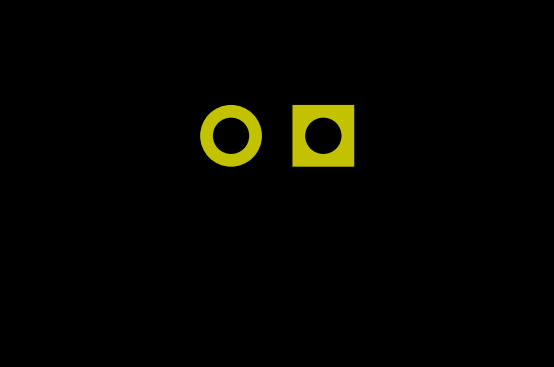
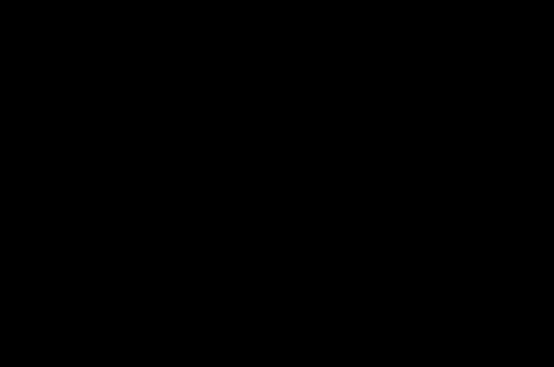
part: (277, 135) -> none

